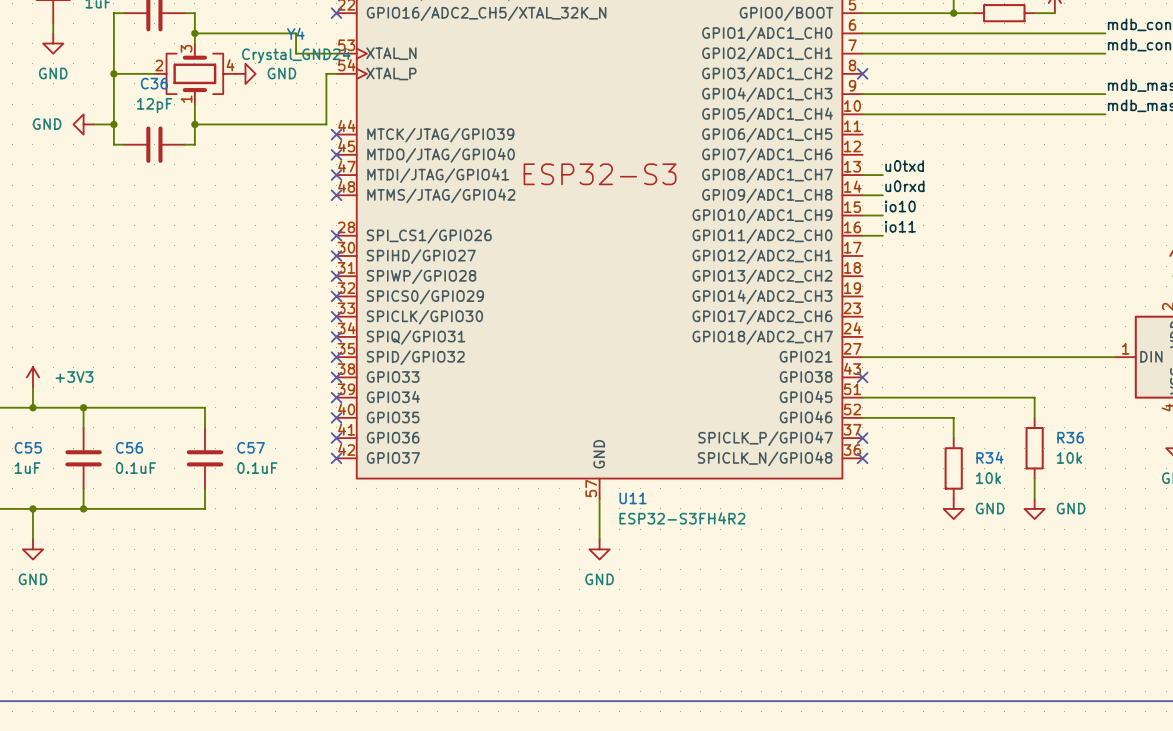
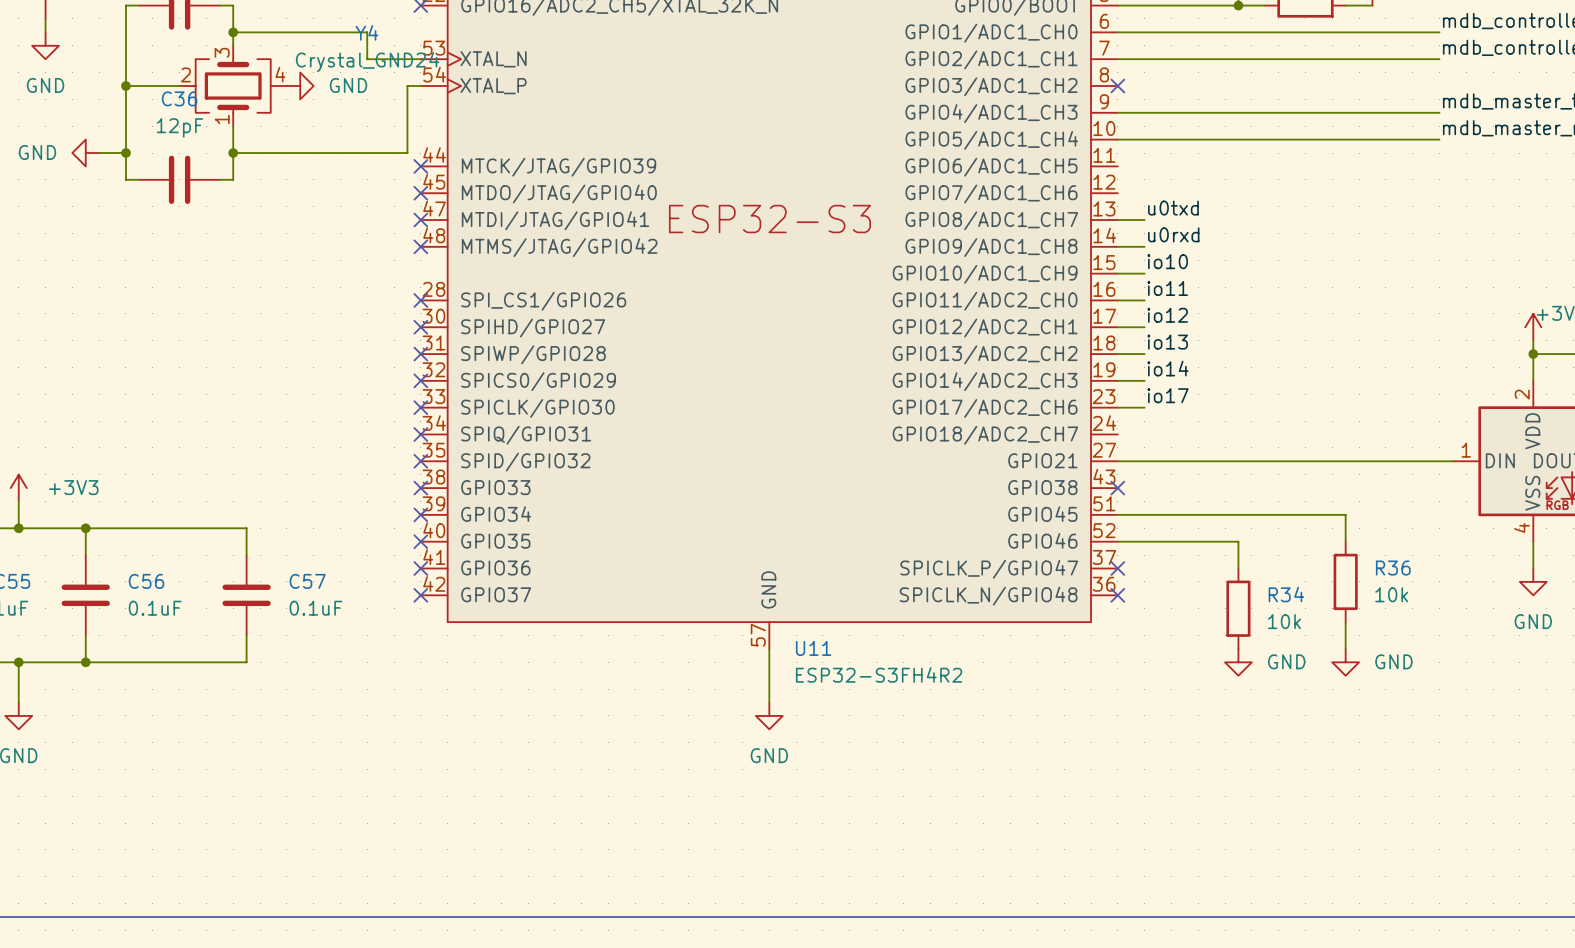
label: none -> io12 (1167, 315)
wire: none -> (1117, 327) (1144, 327)
label: none -> io13 (1167, 342)
wire: none -> (1117, 354) (1144, 354)
label: none -> io14 (1168, 368)
wire: none -> (1117, 380) (1144, 380)
label: none -> io17 (1168, 395)
wire: none -> (1117, 407) (1144, 407)

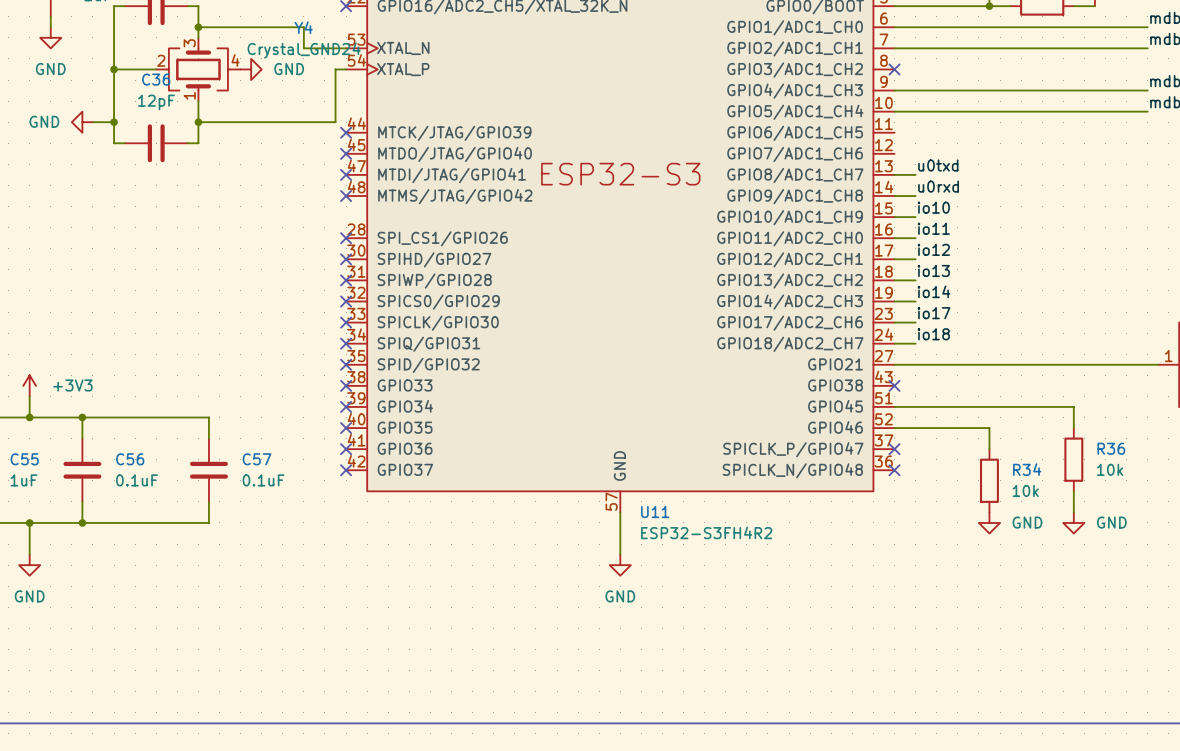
label: none -> io18 (933, 334)
wire: none -> (894, 343) (915, 343)

